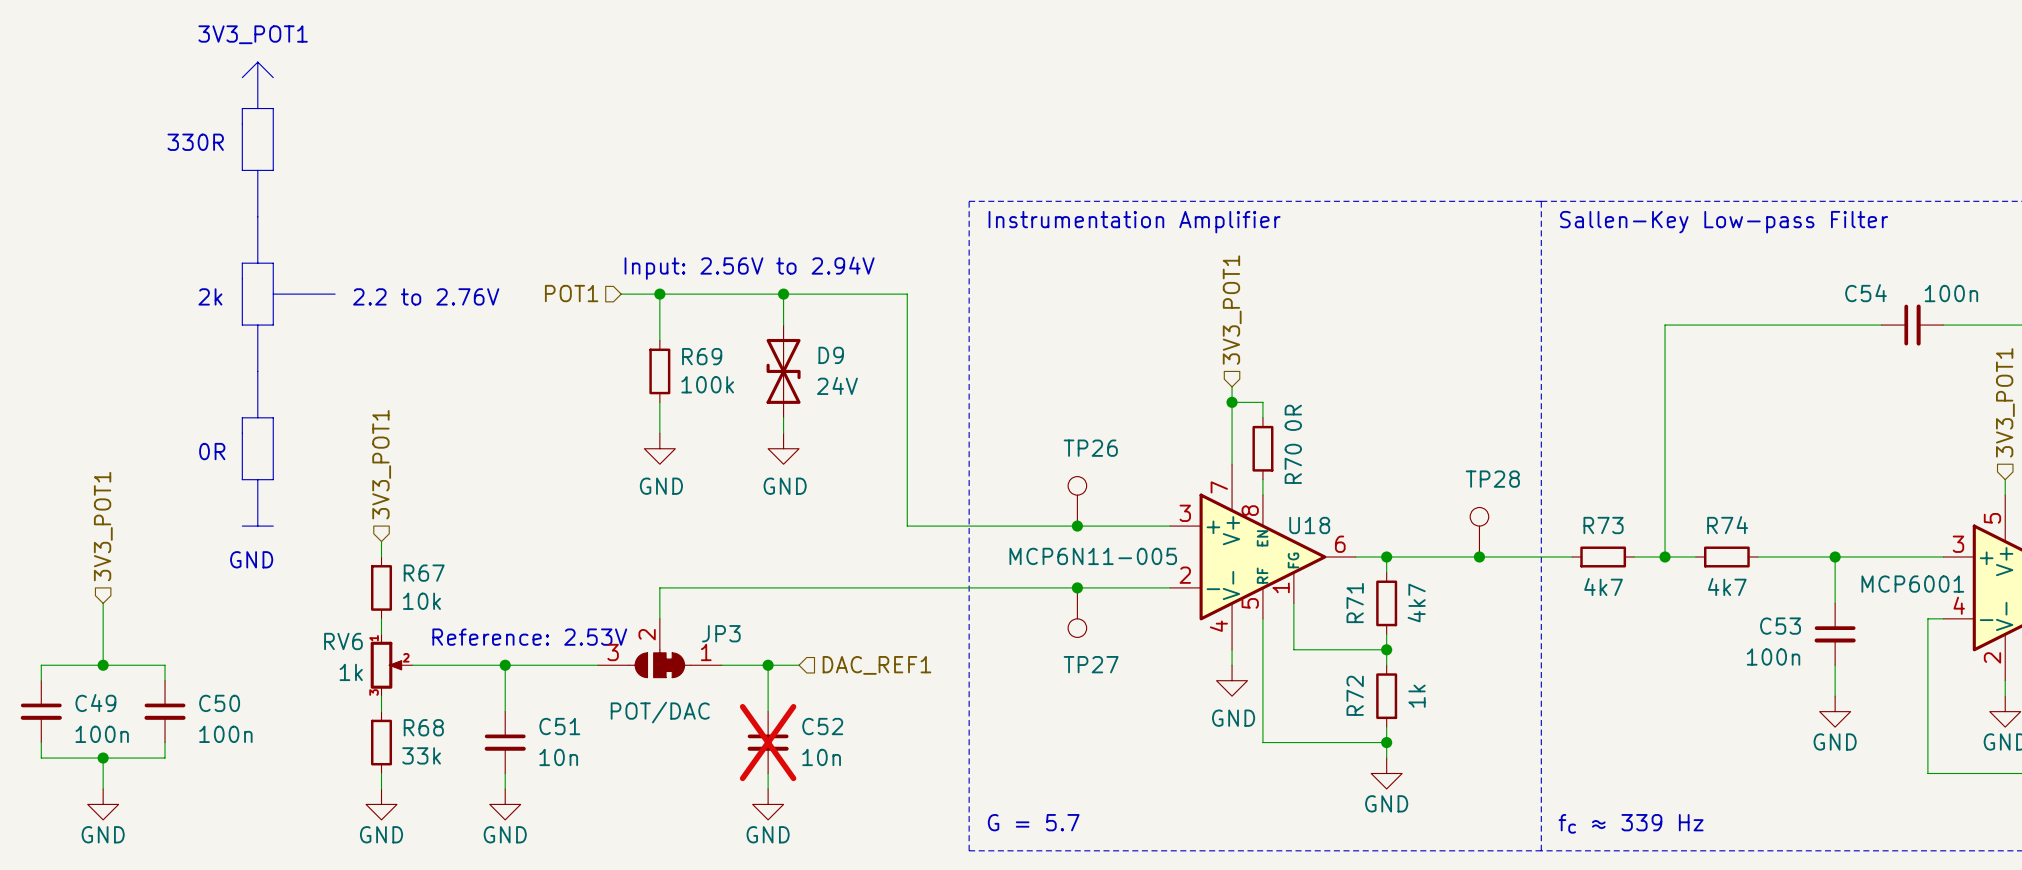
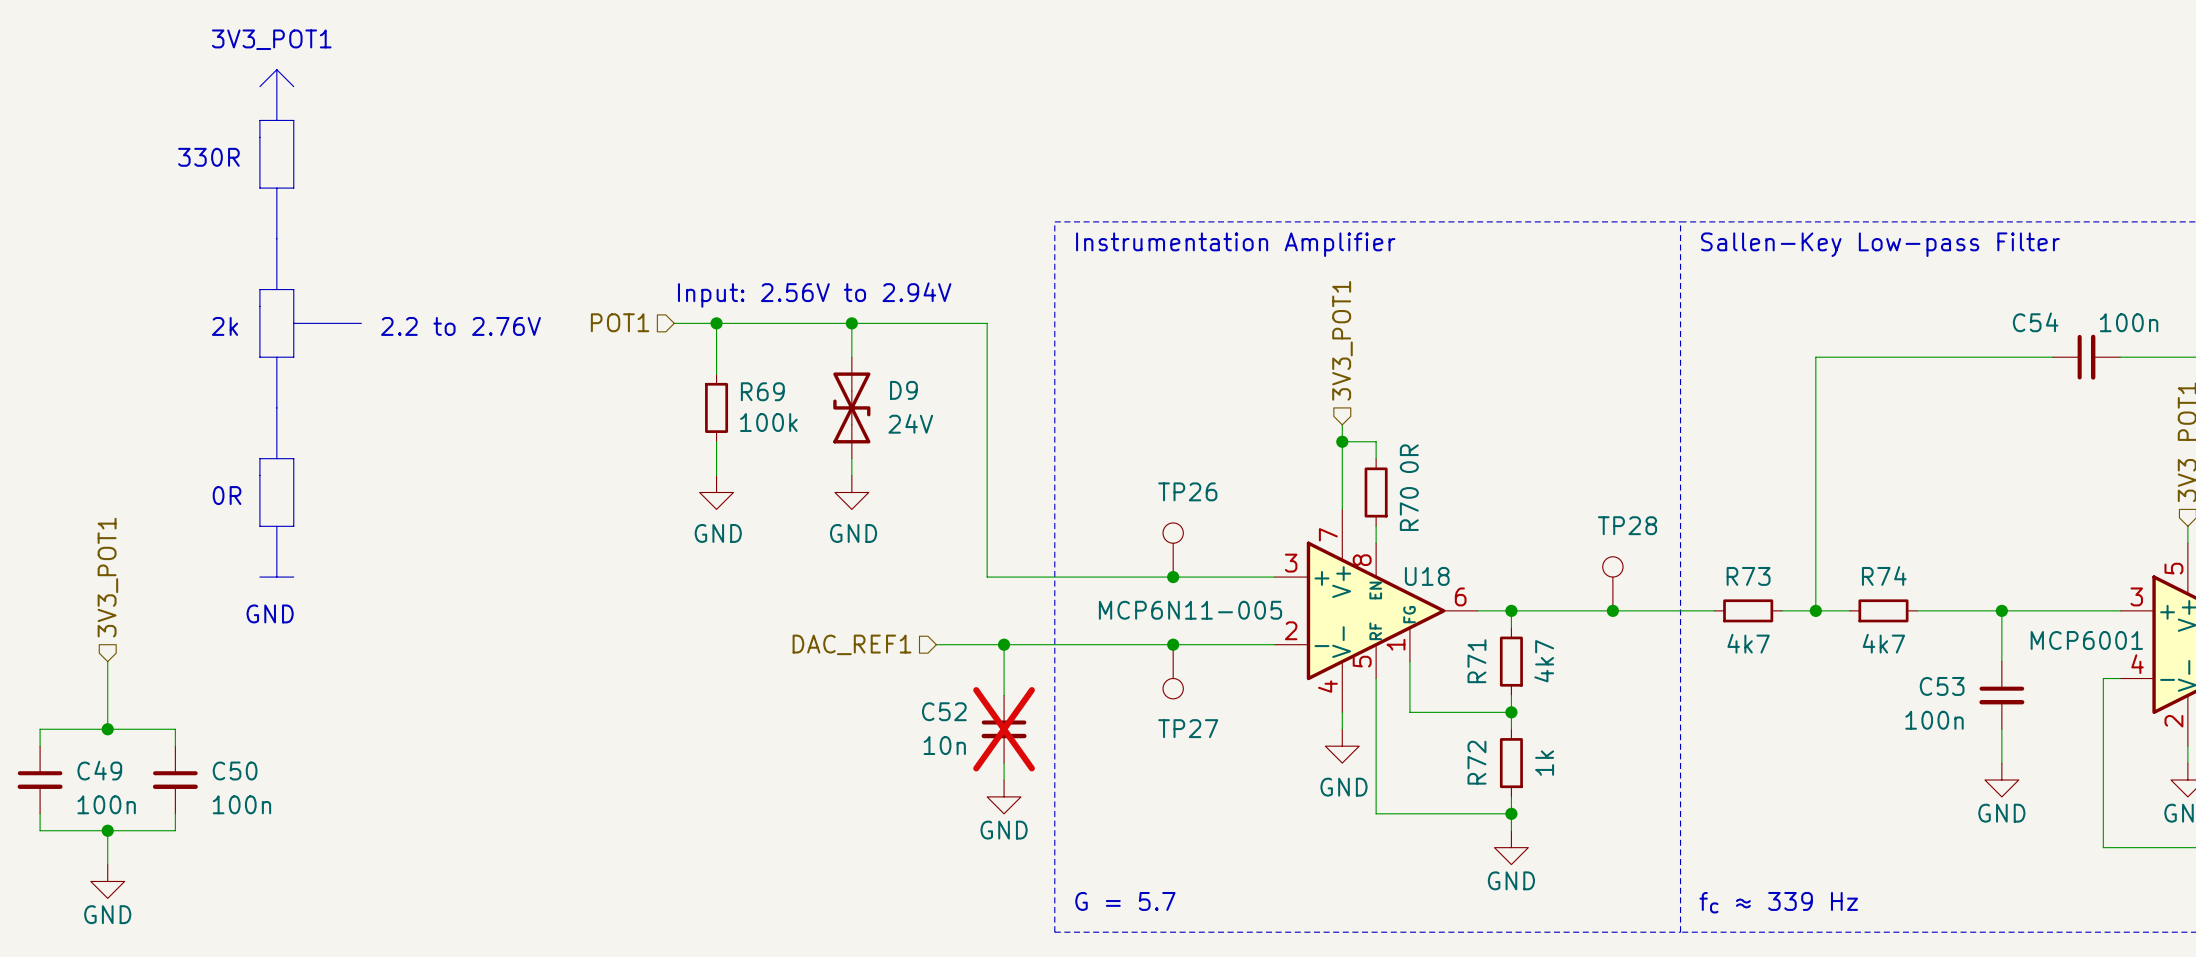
hierarchical label: 3V3_POT1 (381, 464) -> none
wire: (381, 541) (381, 557) -> none
R67: 10k (381, 587) -> none
wire: (860, 587) (659, 587) (659, 618) -> none
junction: none -> (1004, 644)
wire: (381, 618) (381, 634) -> none
text: Reference: 2.53V (529, 637) -> none
JP3: POT/DAC (659, 648) -> none
RV6: 1k (391, 665) -> none
wire: (412, 665) (598, 665) -> none
wire: (505, 665) (505, 711) -> none
junction: (505, 665) -> none
wire: (721, 665) (799, 665) -> none
wire: (768, 665) (768, 711) -> (1004, 644) (1004, 695)
junction: (768, 665) -> none
hierarchical label rotation: 0° (876, 665) -> 180° (851, 644)
hierarchical label position: DAC_REF1 (876, 665) -> DAC_REF1 (851, 644)
wire: (381, 696) (381, 711) -> none
C52 name position: C52 (822, 726) -> C52 (944, 711)
R68: 33k (381, 742) -> none
C51: 10n (505, 742) -> none
C52 position: (768, 742) -> (1004, 729)
C52 value position: 10n (821, 757) -> 10n (944, 745)
wire: (381, 773) (381, 788) -> none
wire: (505, 773) (505, 788) -> none
wire: (768, 773) (768, 788) -> (1004, 763) (1004, 780)
power symbol: GND (381, 804) -> none
power symbol: GND (505, 804) -> none
power symbol position: GND (768, 804) -> GND (1004, 796)

